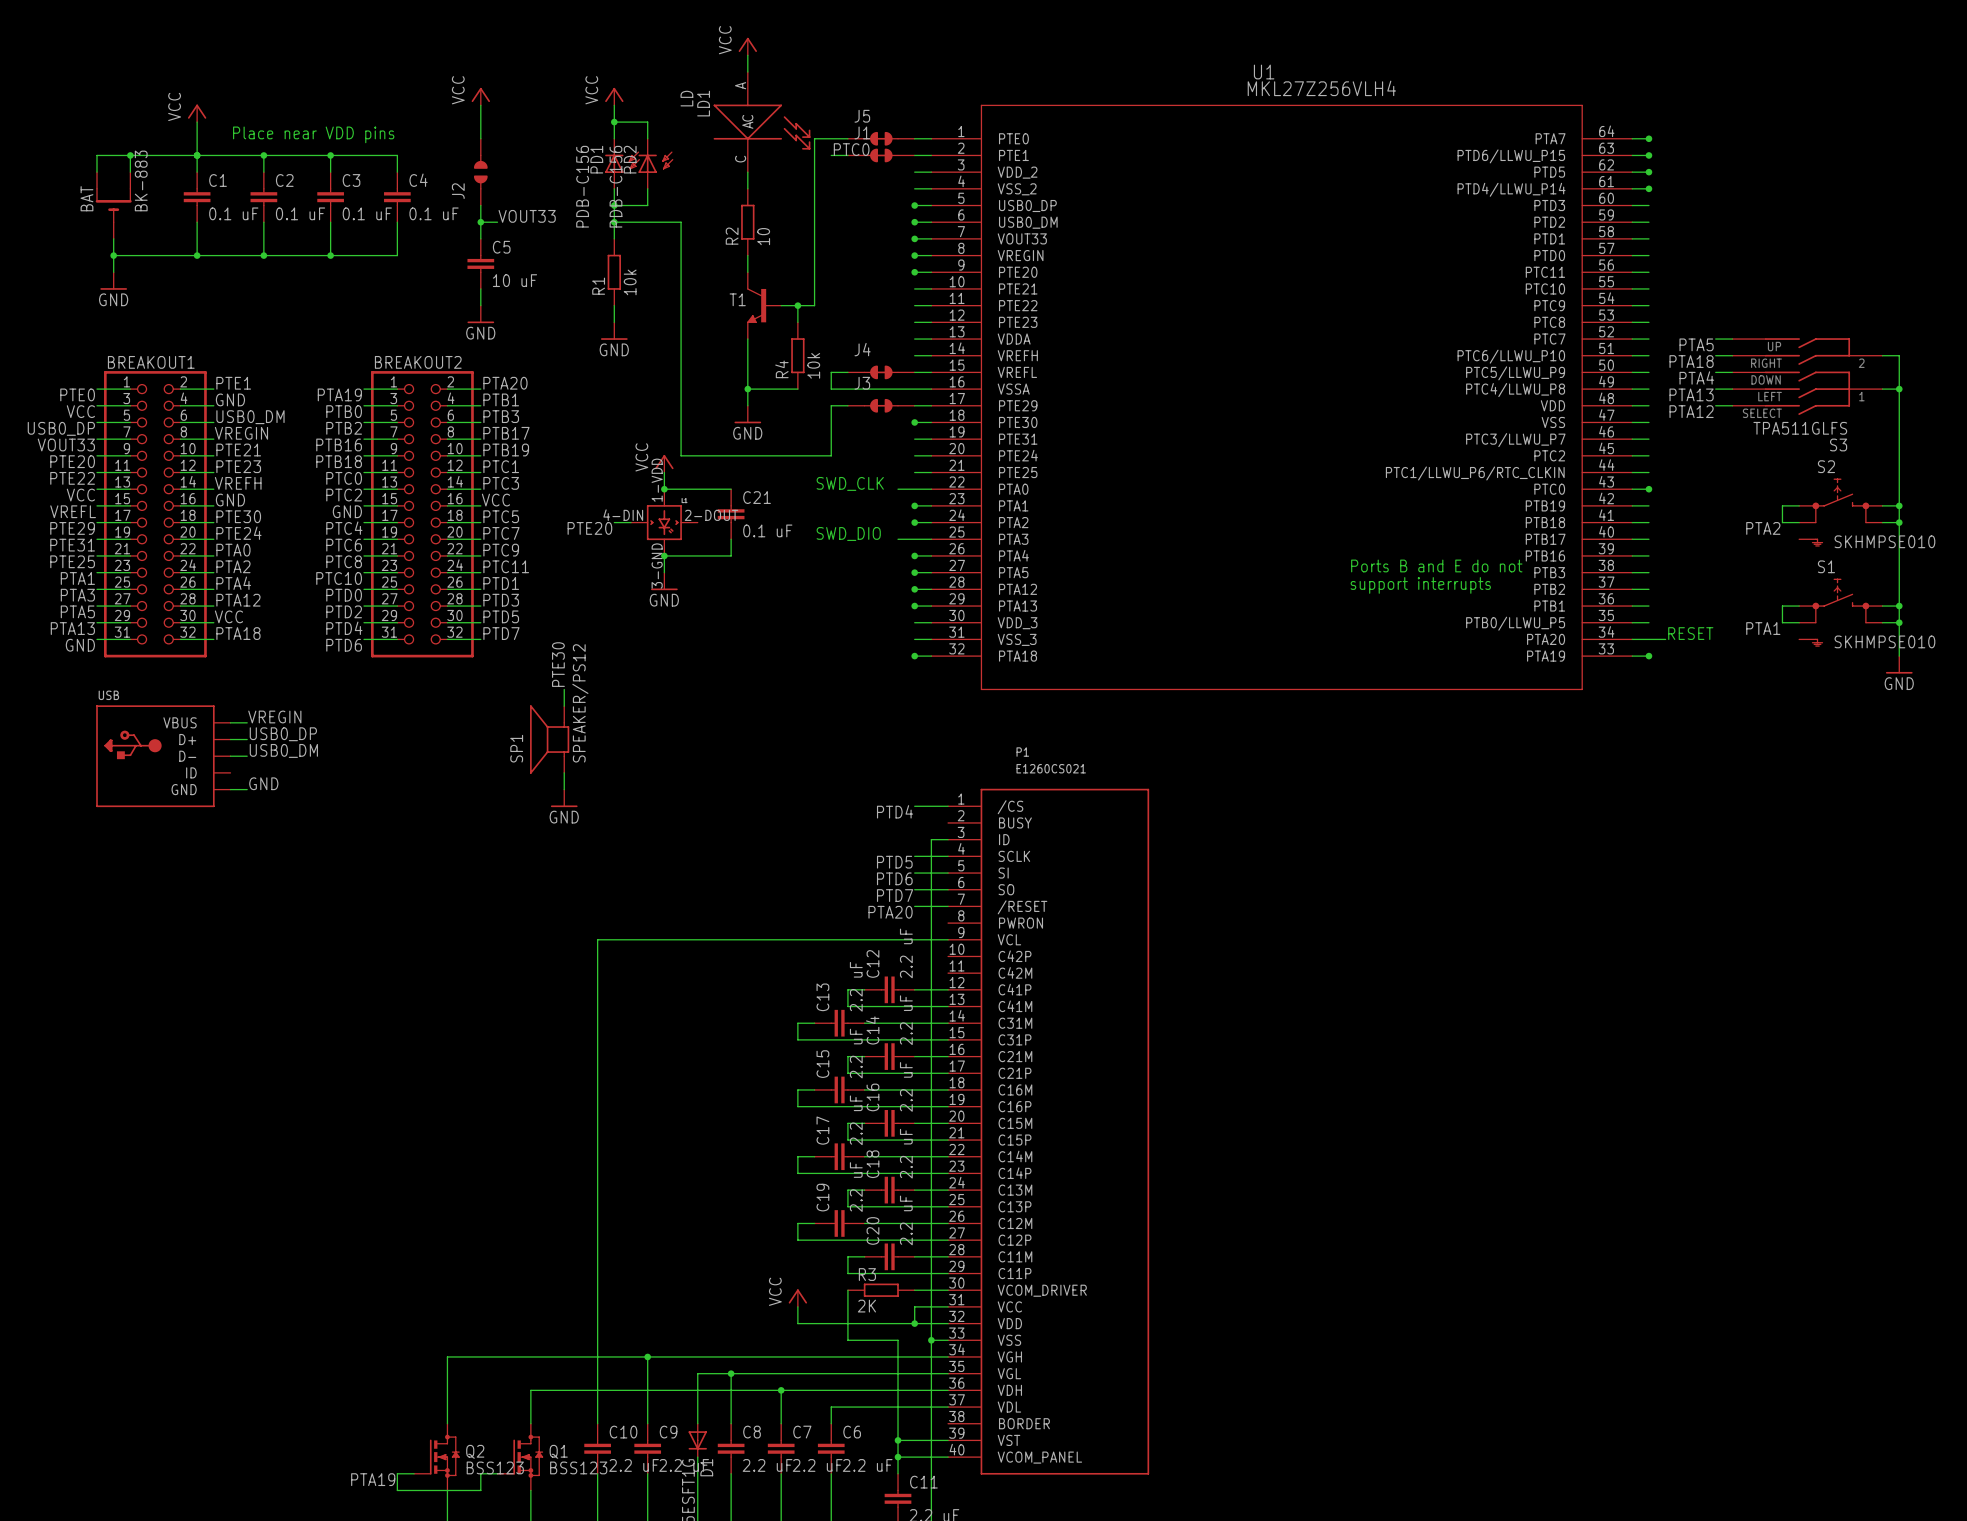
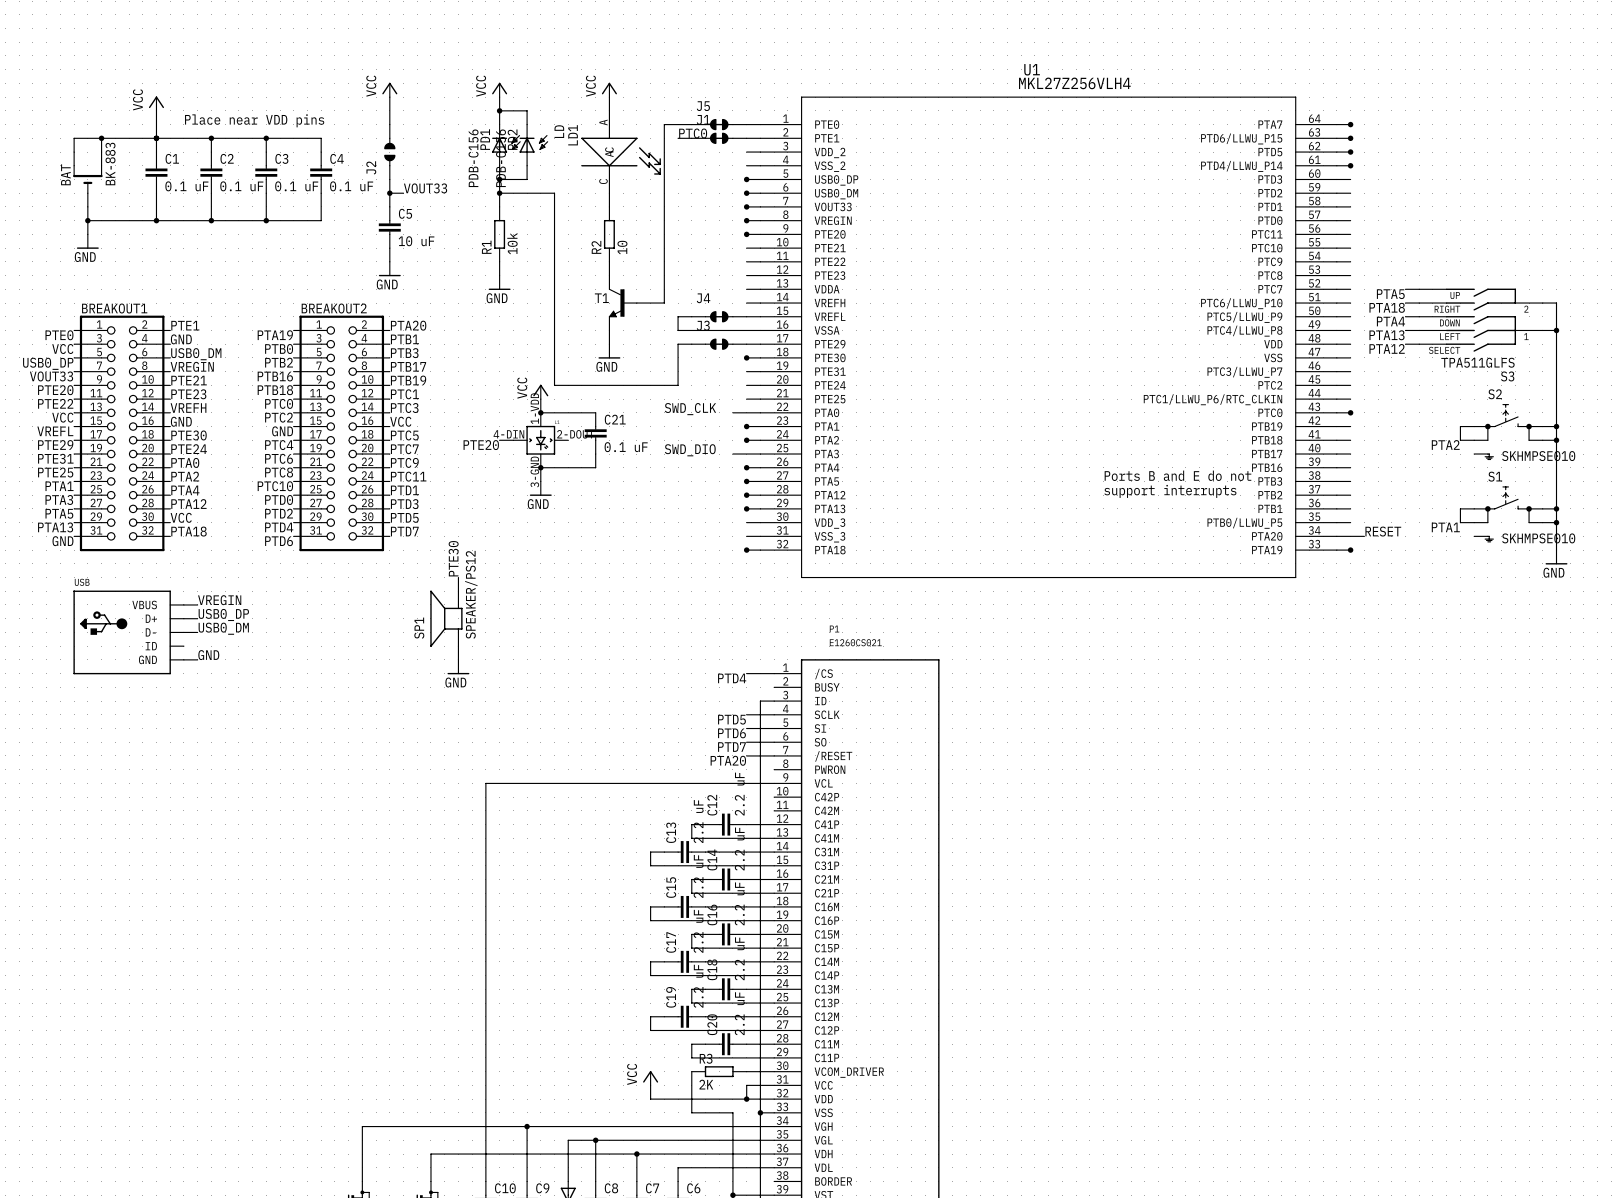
power symbol position: VCC (747, 46) -> VCC (609, 89)
wire: (747, 55) (747, 72) -> (609, 97) (609, 110)
LD1 position: (762, 122) -> (621, 152)
wire: (747, 172) (747, 188) -> (609, 193) (609, 206)
R2 position: (747, 222) -> (609, 234)
wire: (747, 255) (747, 272) -> (609, 261) (609, 275)
T1 position: (764, 305) -> (622, 303)
wire: (781, 305) (814, 305) -> (636, 303) (664, 303) (664, 261)
wire: (797, 305) (797, 322) -> none
junction: (797, 305) -> none
wire: (747, 339) (747, 389) (797, 389) -> none
R4: 10k (797, 355) -> none
junction: (747, 389) -> none

